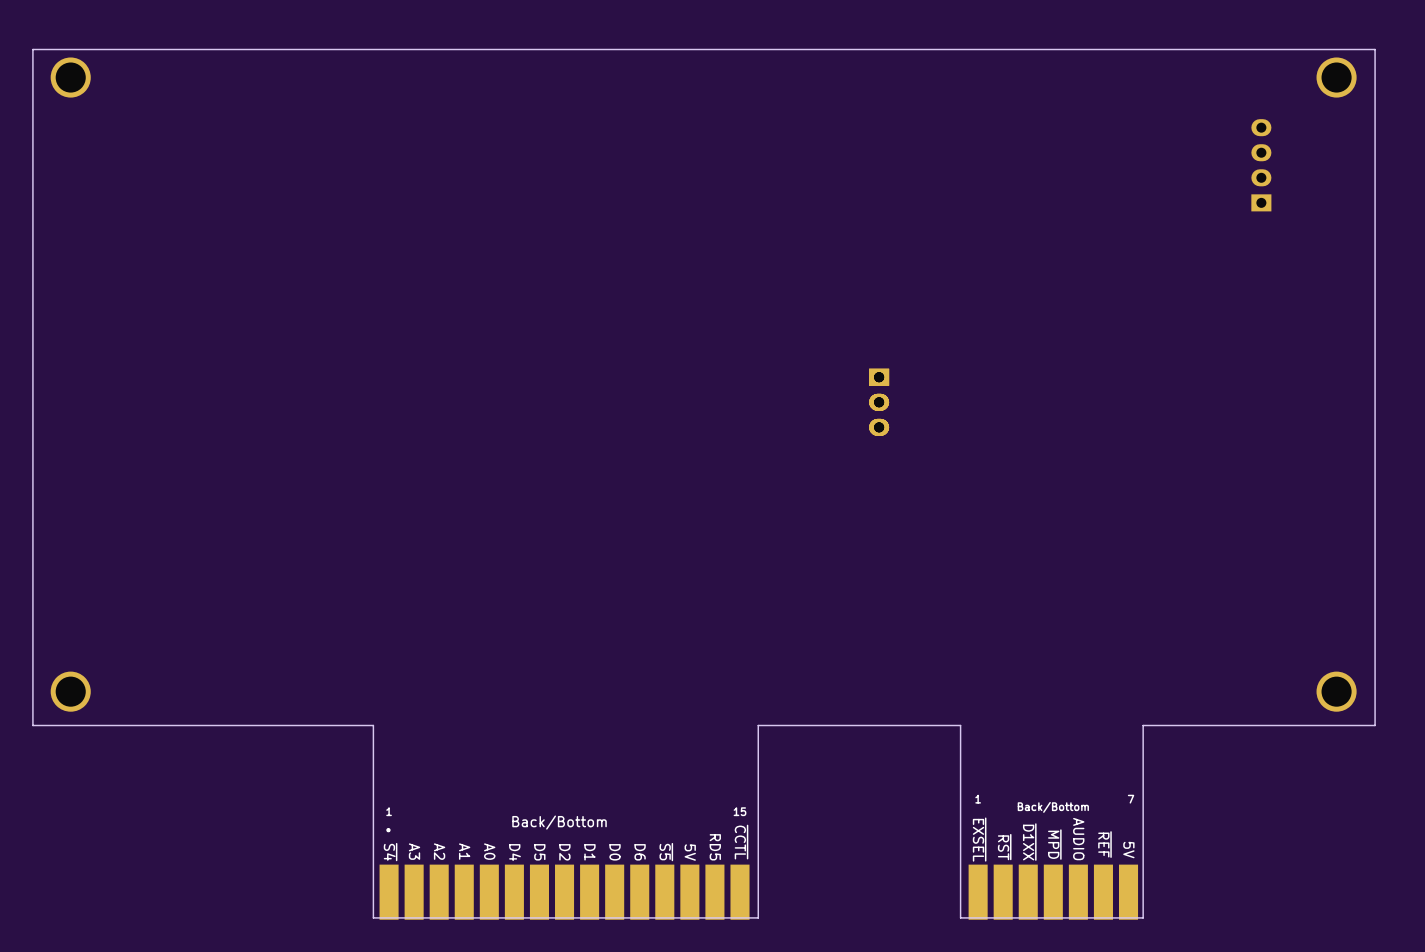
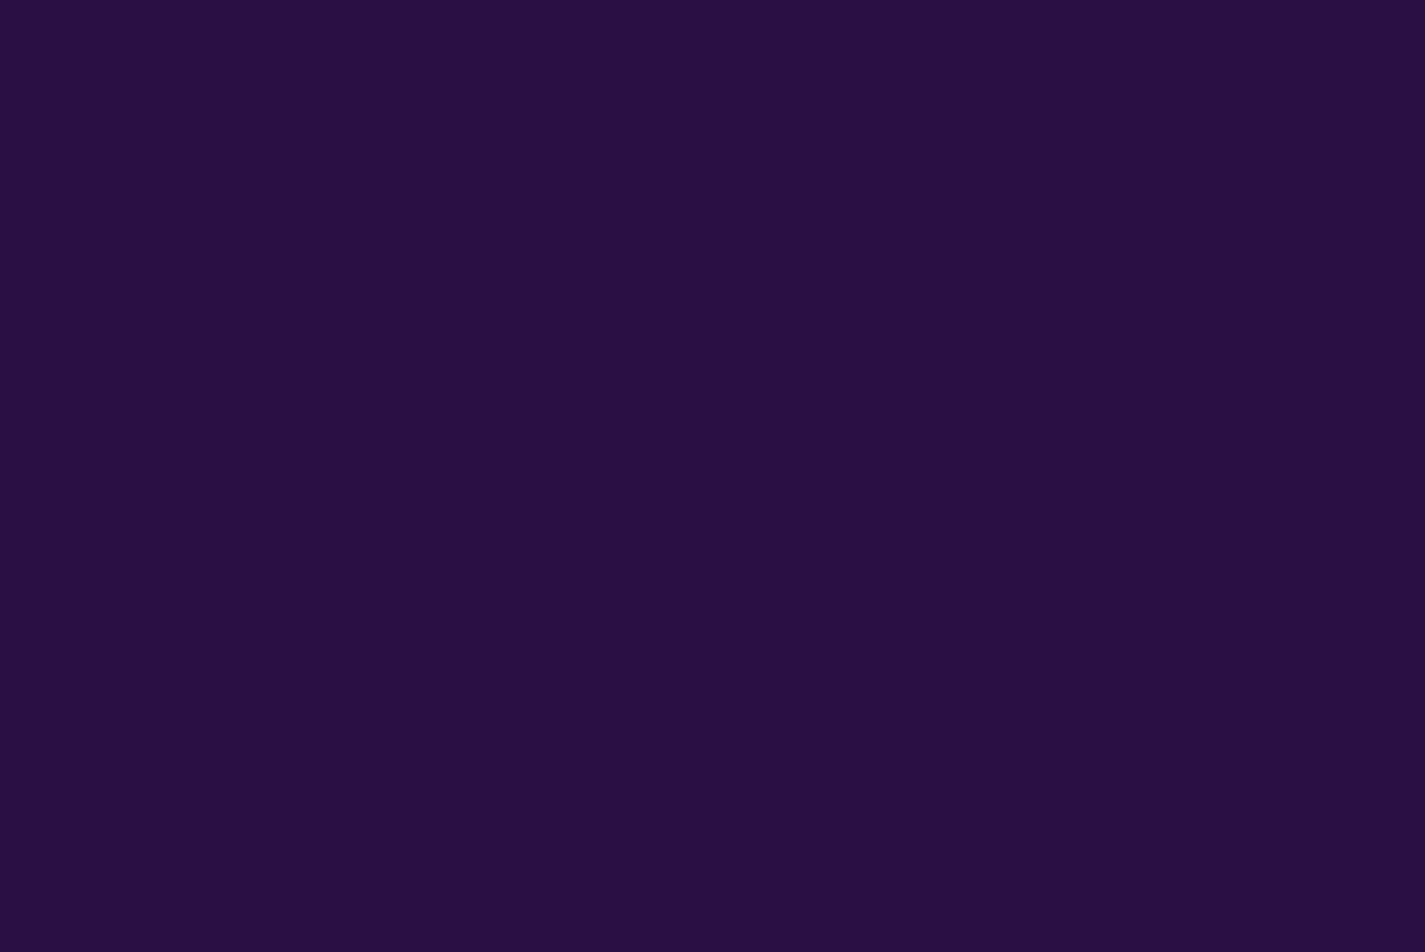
board edge: (1375, 49) (1375, 725) (1143, 725) (1143, 917) (960, 917) (960, 725) (758, 725) (758, 917) (373, 917) (373, 725) (32, 725) (32, 49) (1375, 49) -> none
part: (70, 77) -> none
part: (1336, 77) -> none
part: (1261, 165) -> none
part: (879, 402) -> none
part: (70, 691) -> none
part: (1336, 691) -> none
part: (564, 873) -> none
part: (1053, 892) -> none

